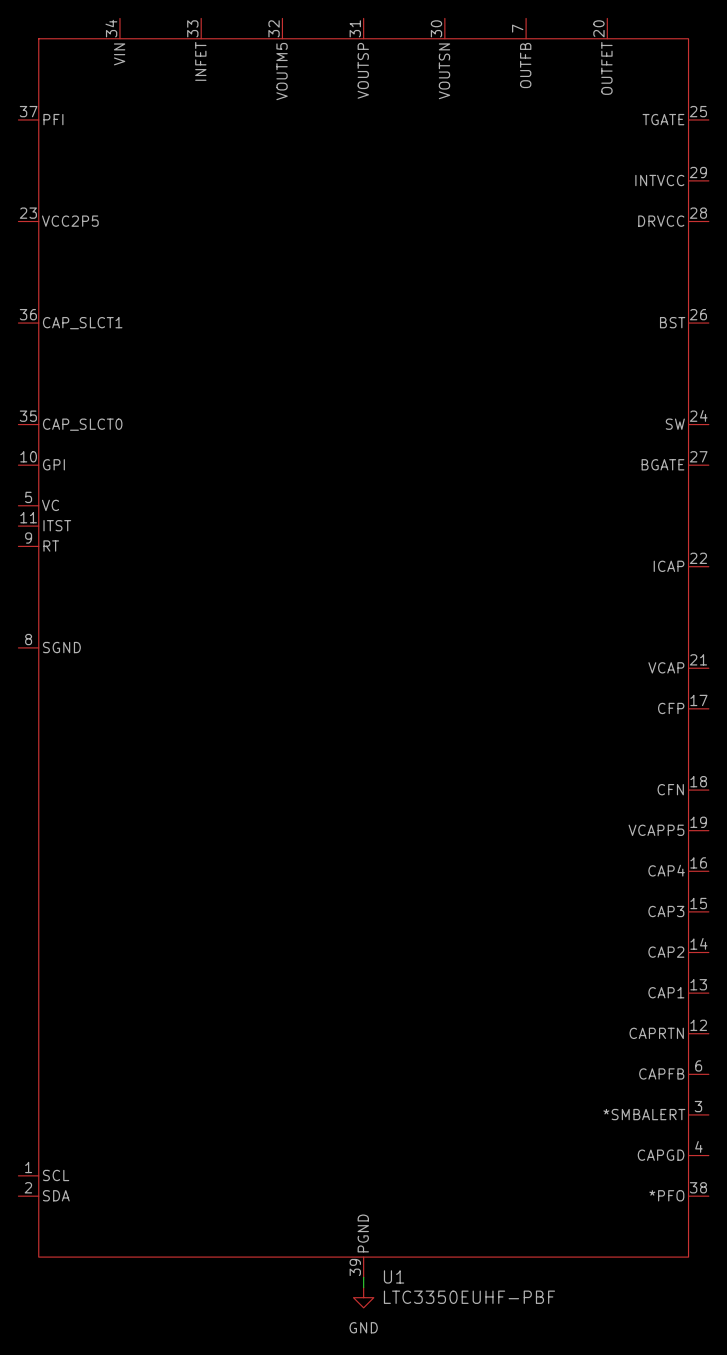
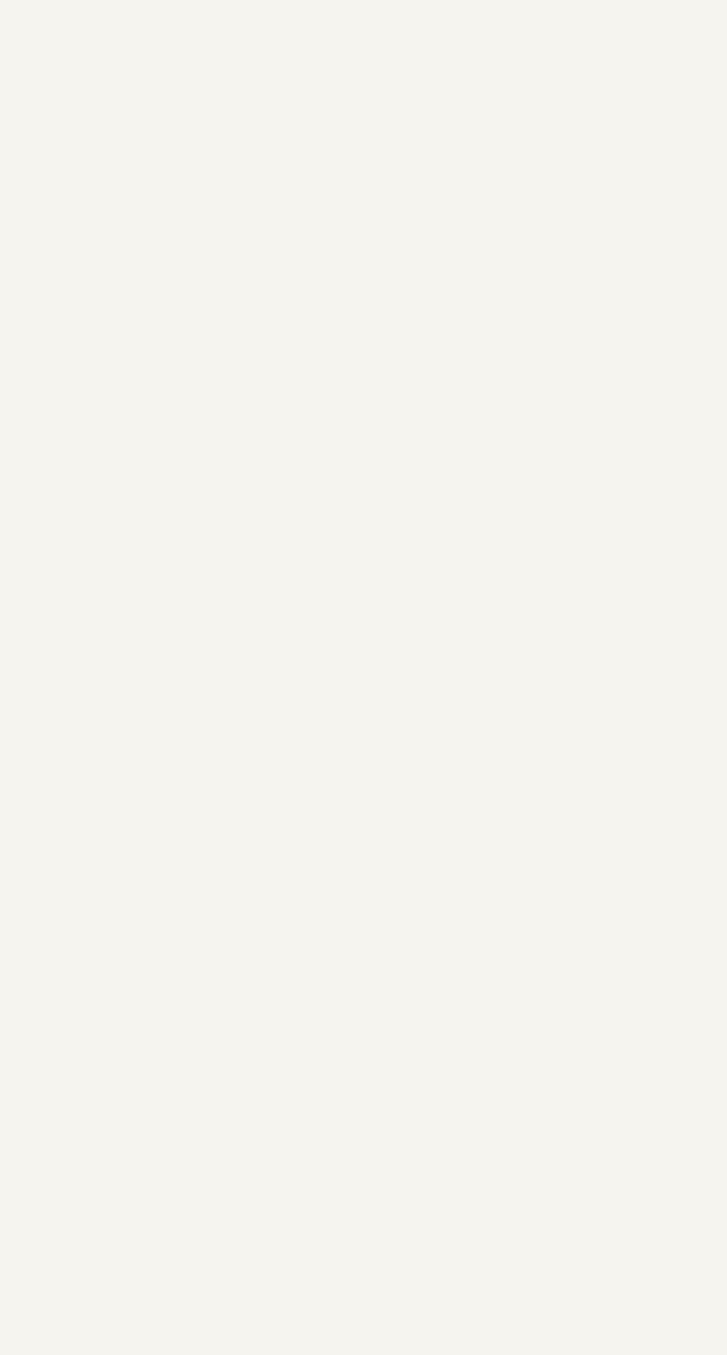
U1: LTC3350EUHF-PBF (363, 647) -> none
wire: (363, 1277) (363, 1287) -> none
power symbol: GND (363, 1297) -> none

